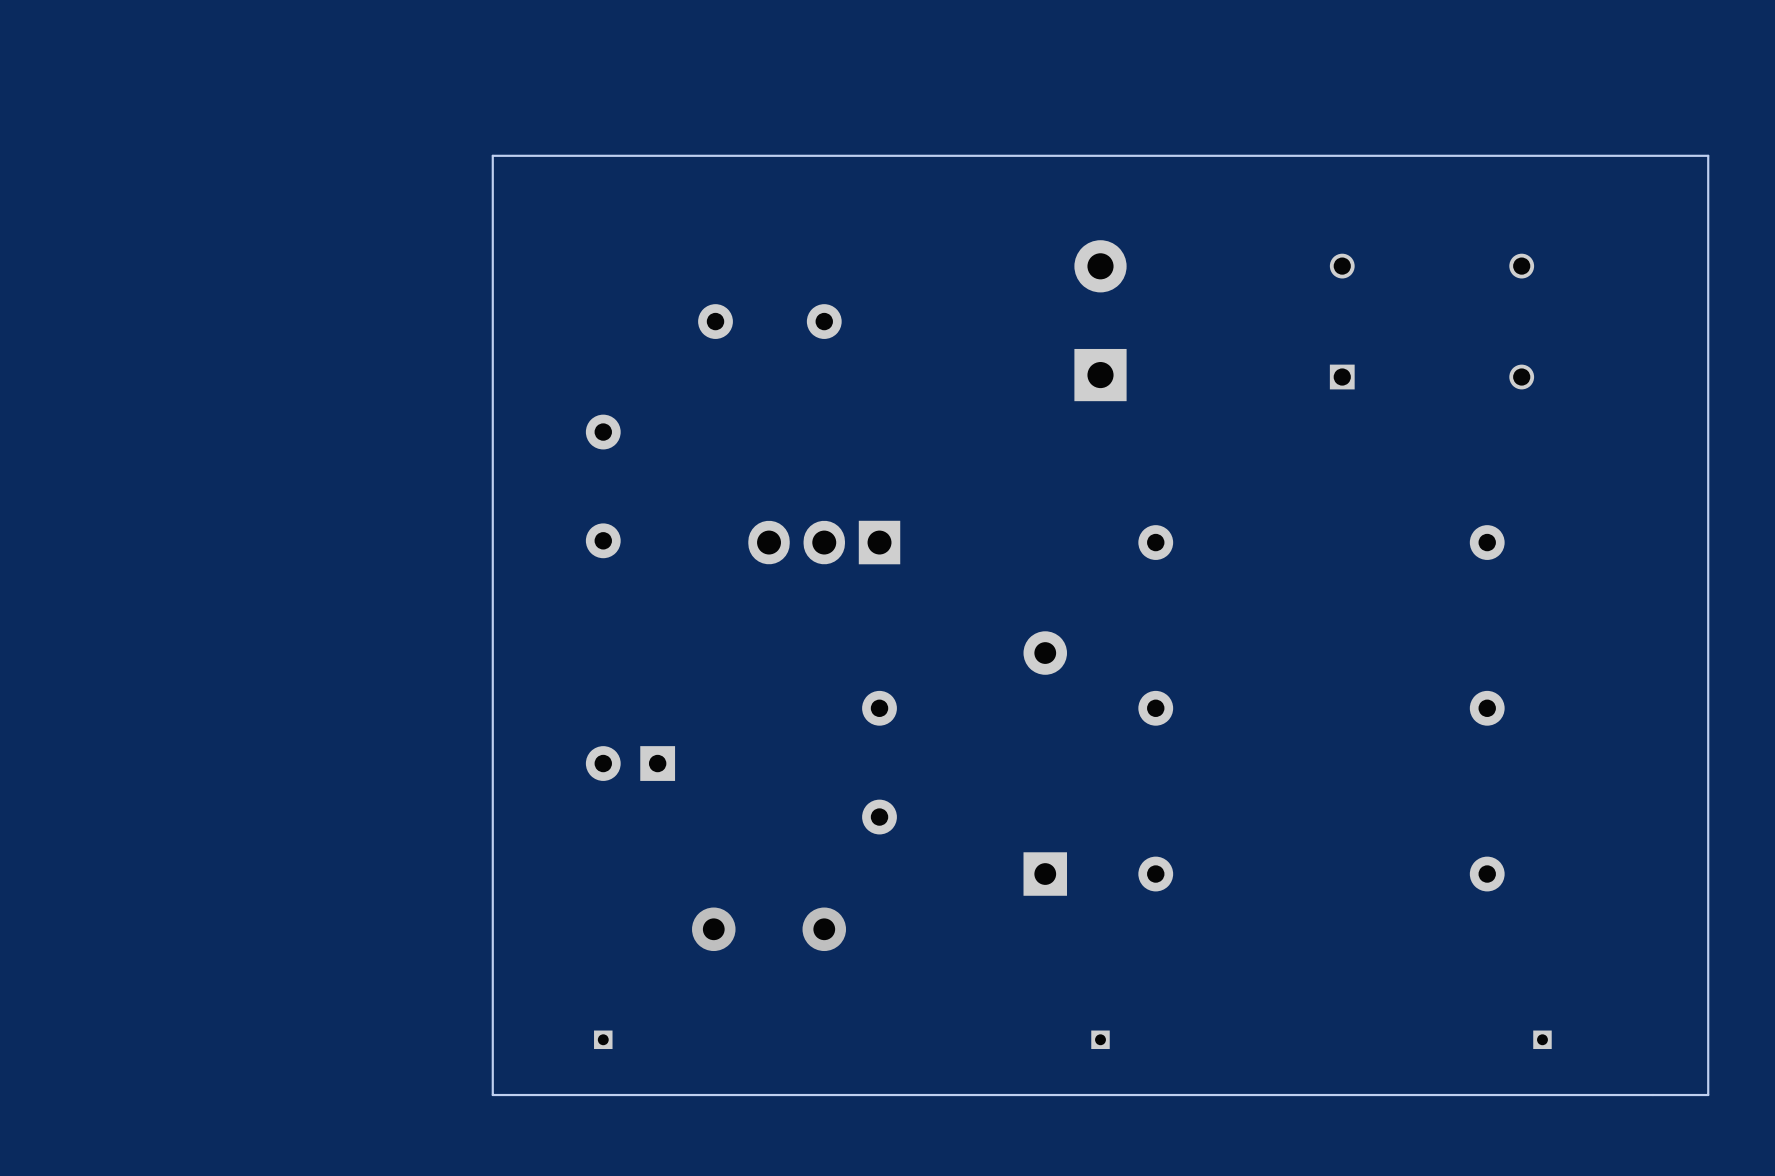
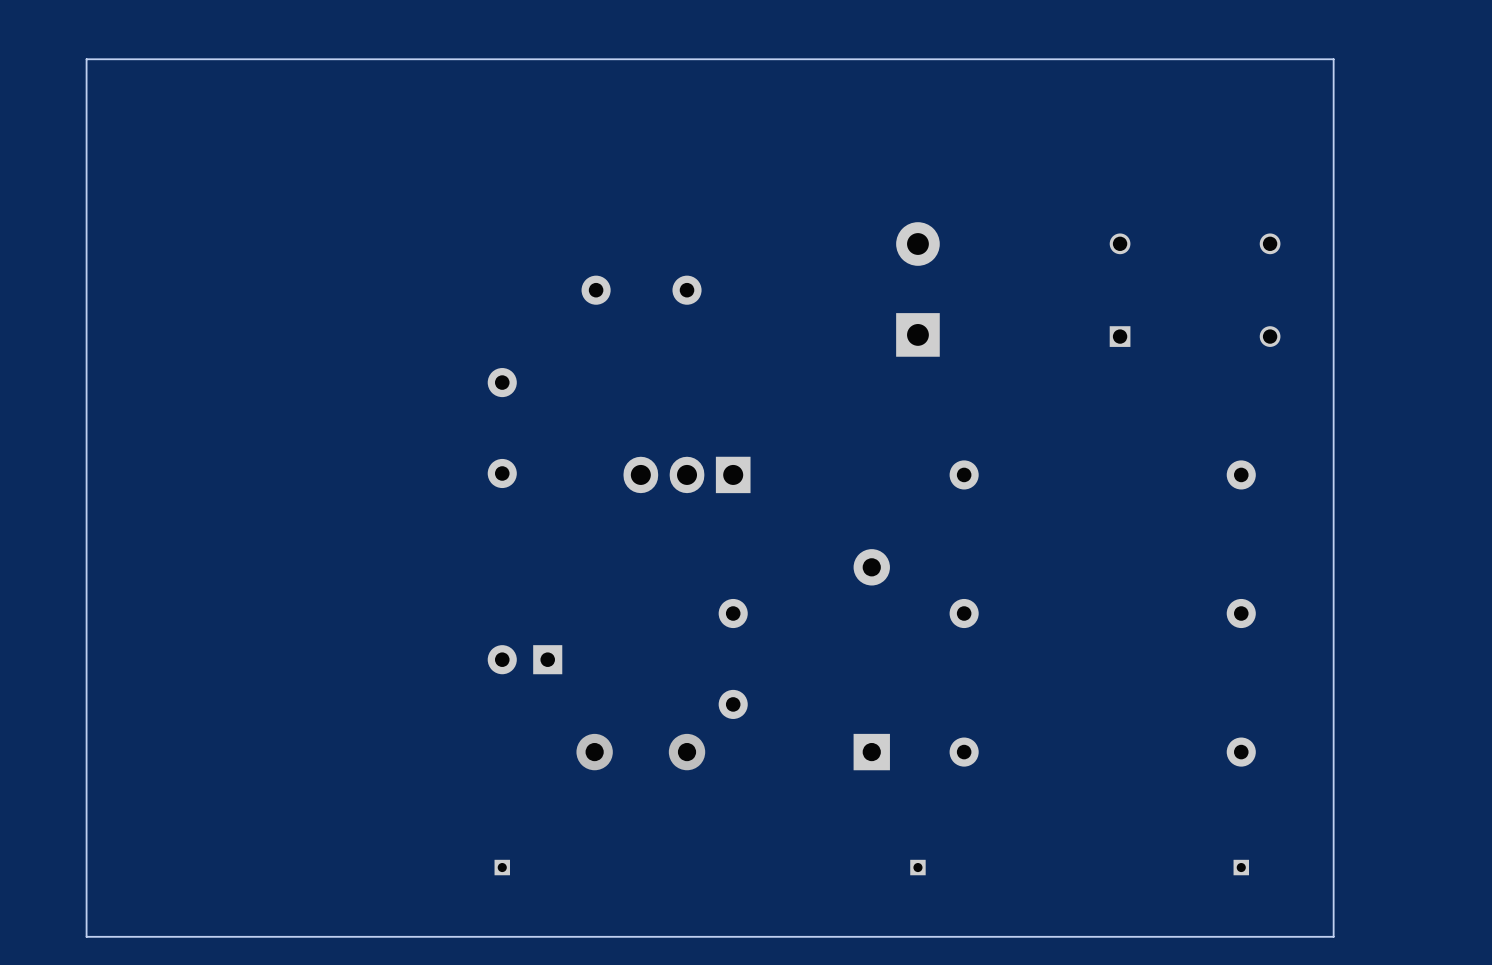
via position: (713, 929) -> (594, 752)
via position: (824, 929) -> (687, 752)
part position: (603, 1039) -> (502, 867)
part position: (1100, 1039) -> (917, 867)
part position: (1542, 1039) -> (1241, 867)
board edge: (1597, 1095) (1708, 1095) (1708, 155) (492, 155) (492, 1095) -> (1333, 936) (1333, 59) (86, 59) (86, 936) (409, 936)

